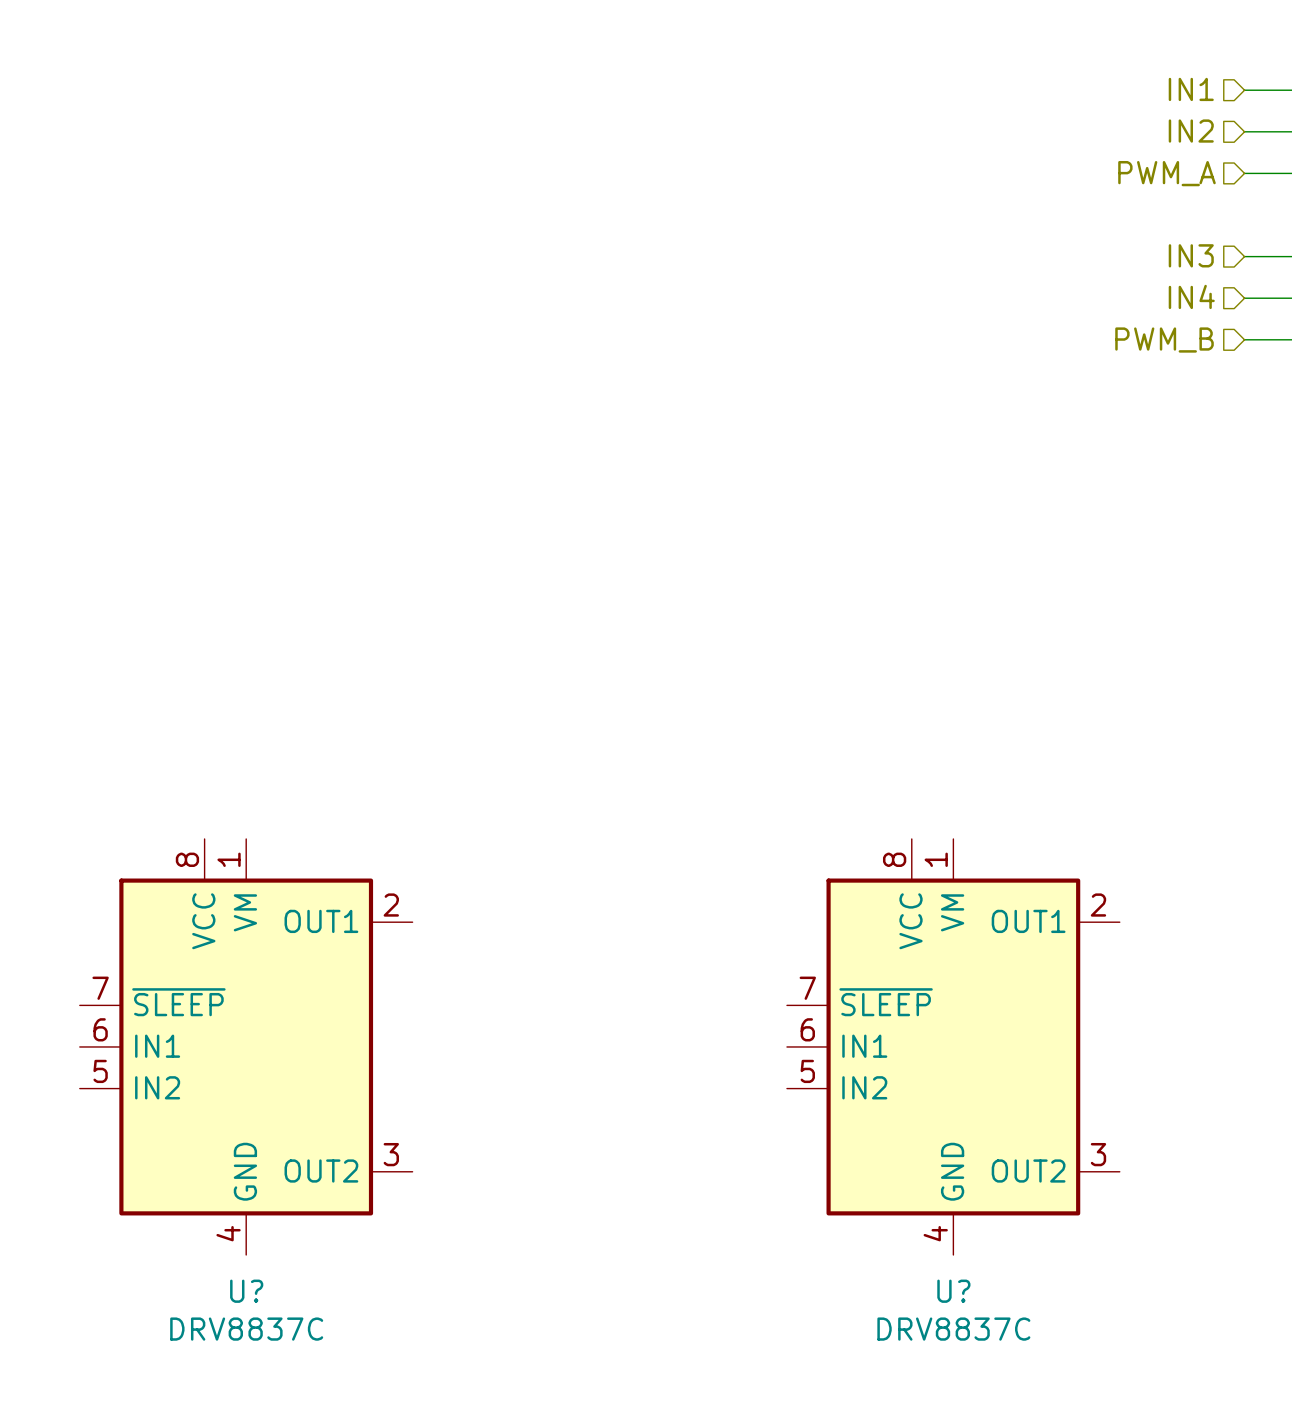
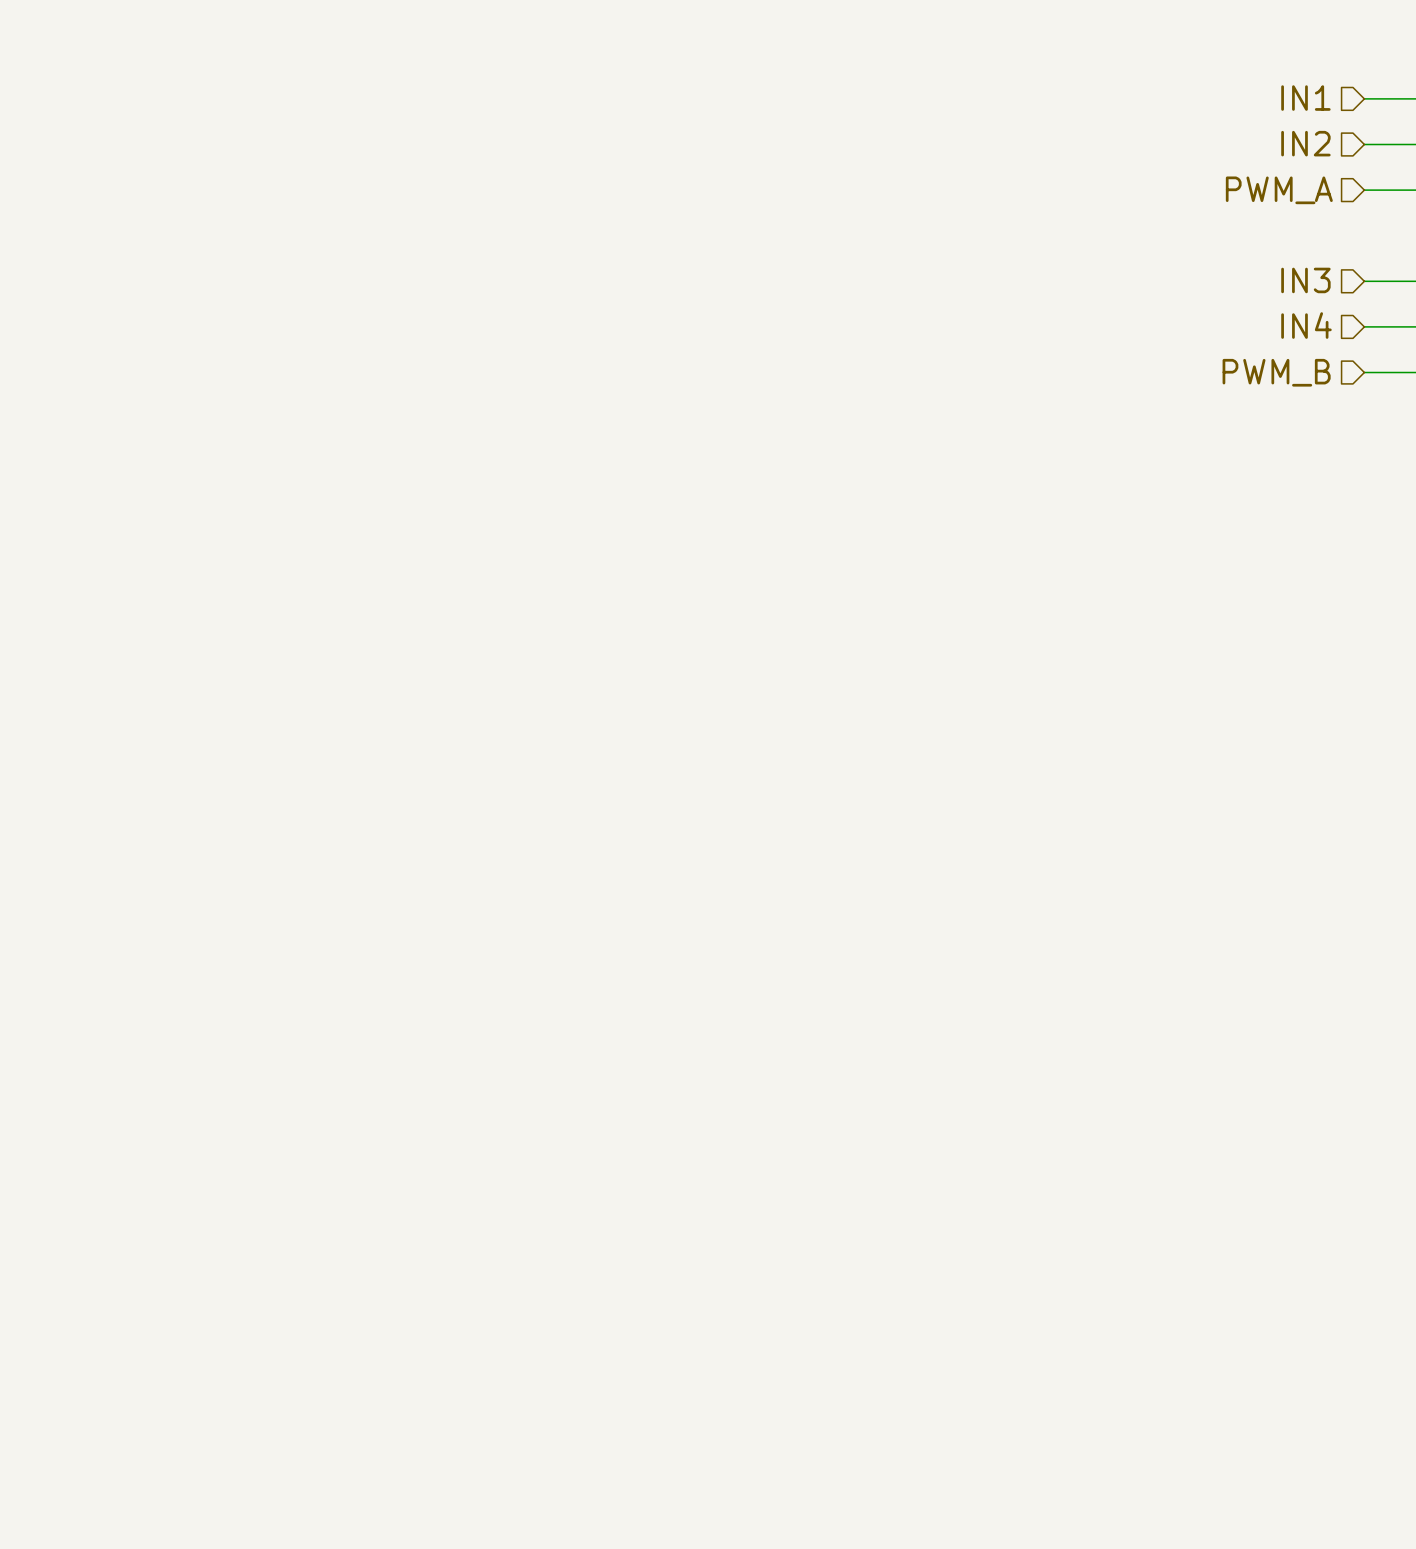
U?: DRV8837C (246, 1046) -> none
U?: DRV8837C (953, 1046) -> none

